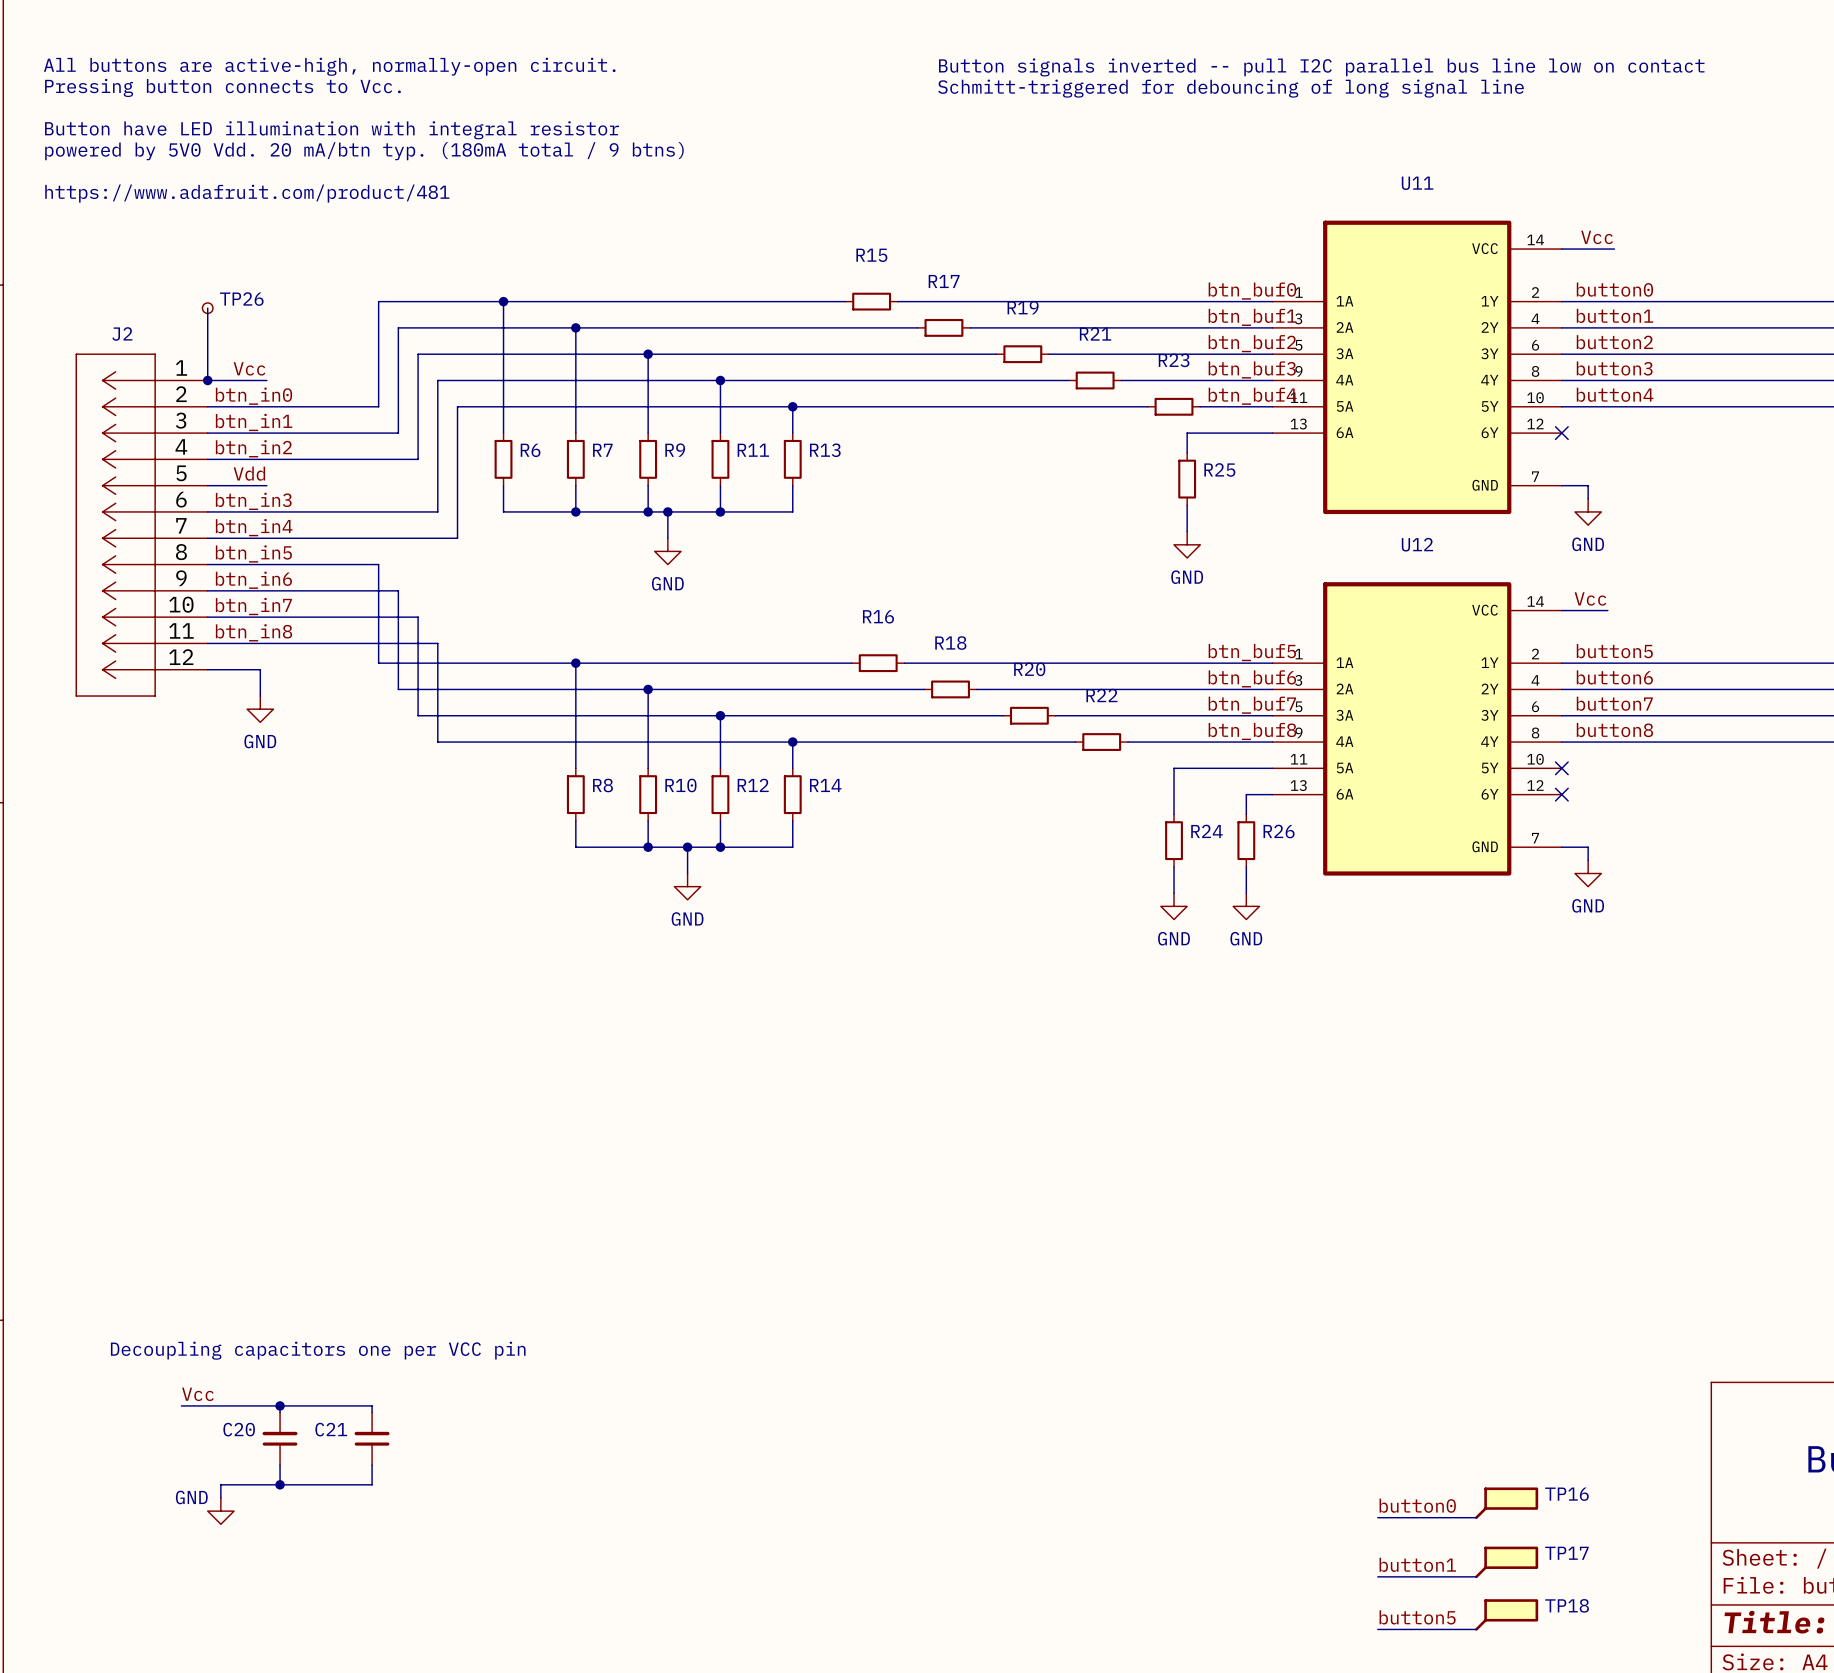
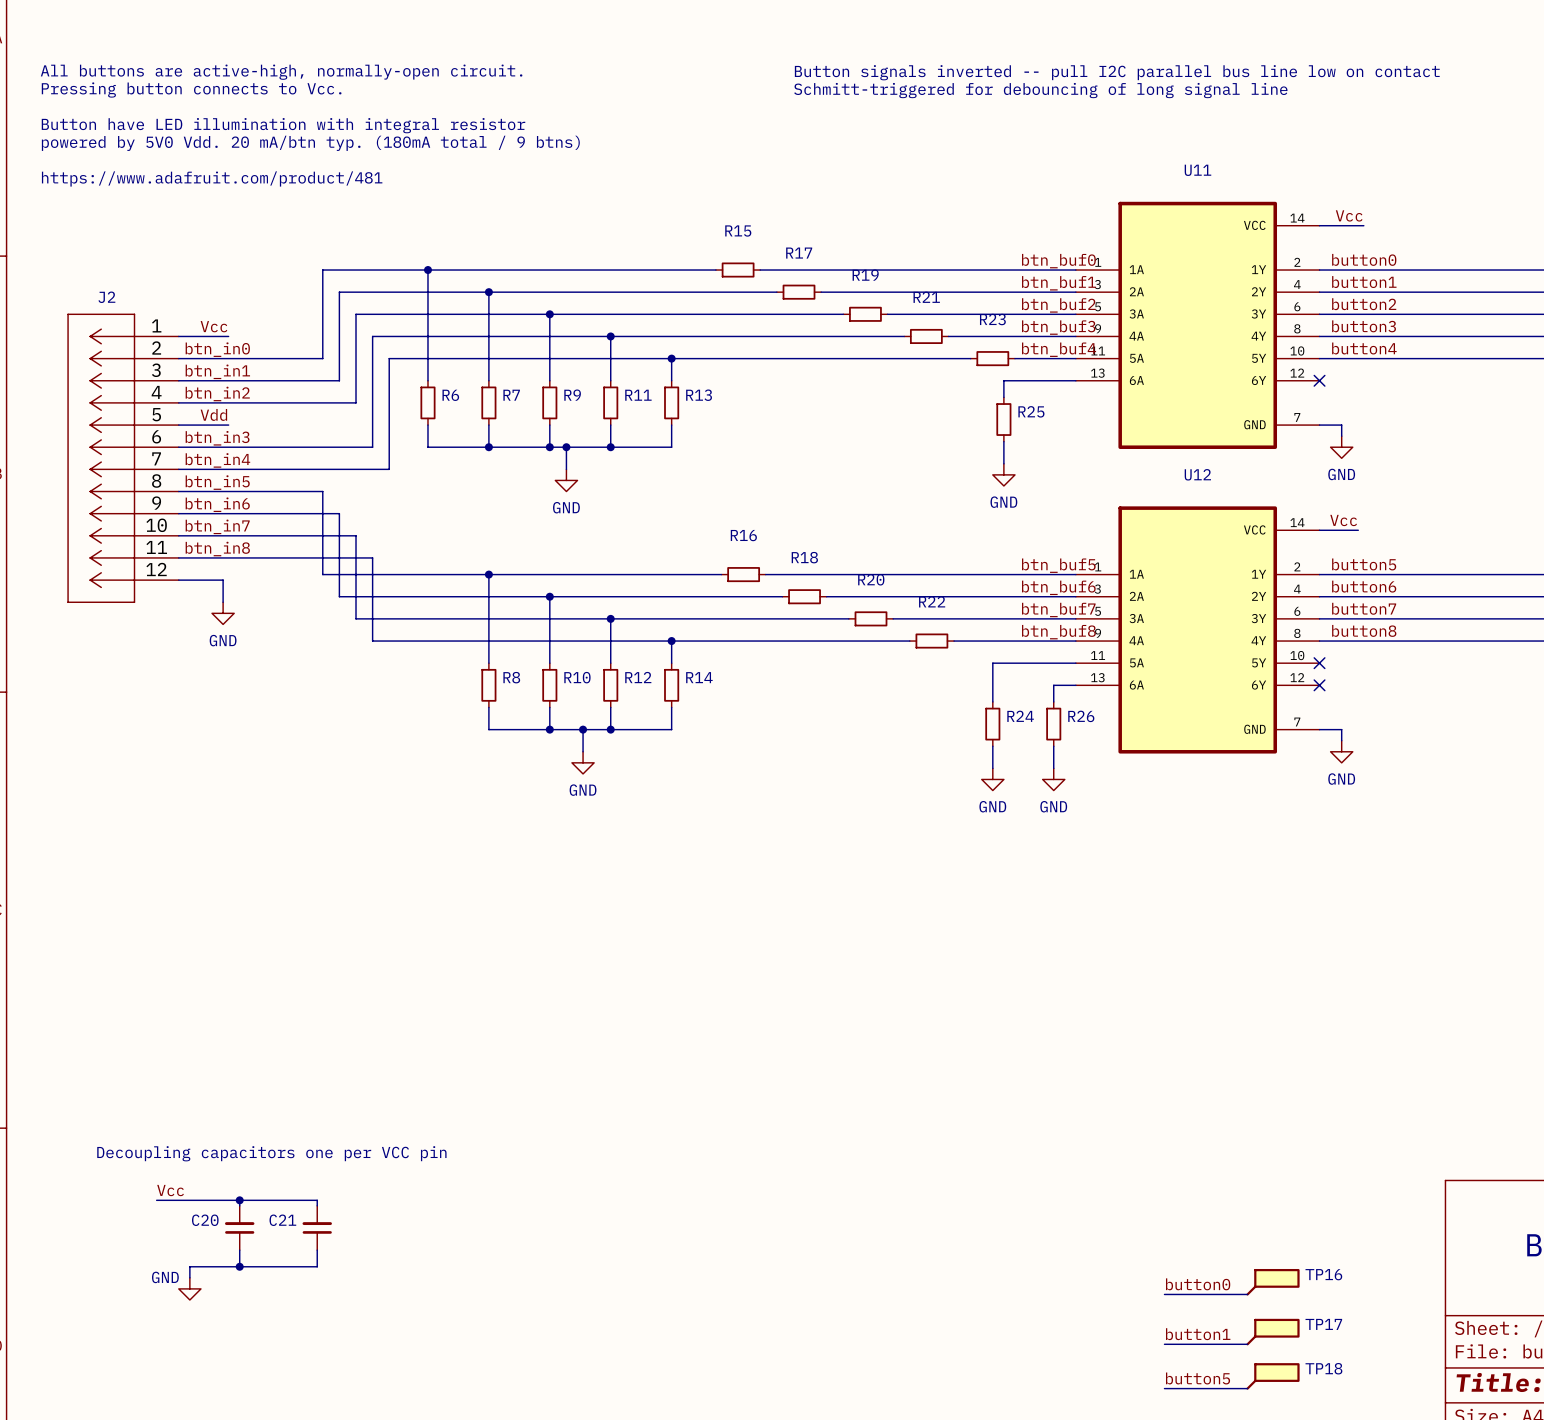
wire: (207, 308) (207, 380) -> none
TP26: (207, 308) -> none
junction: (207, 380) -> none

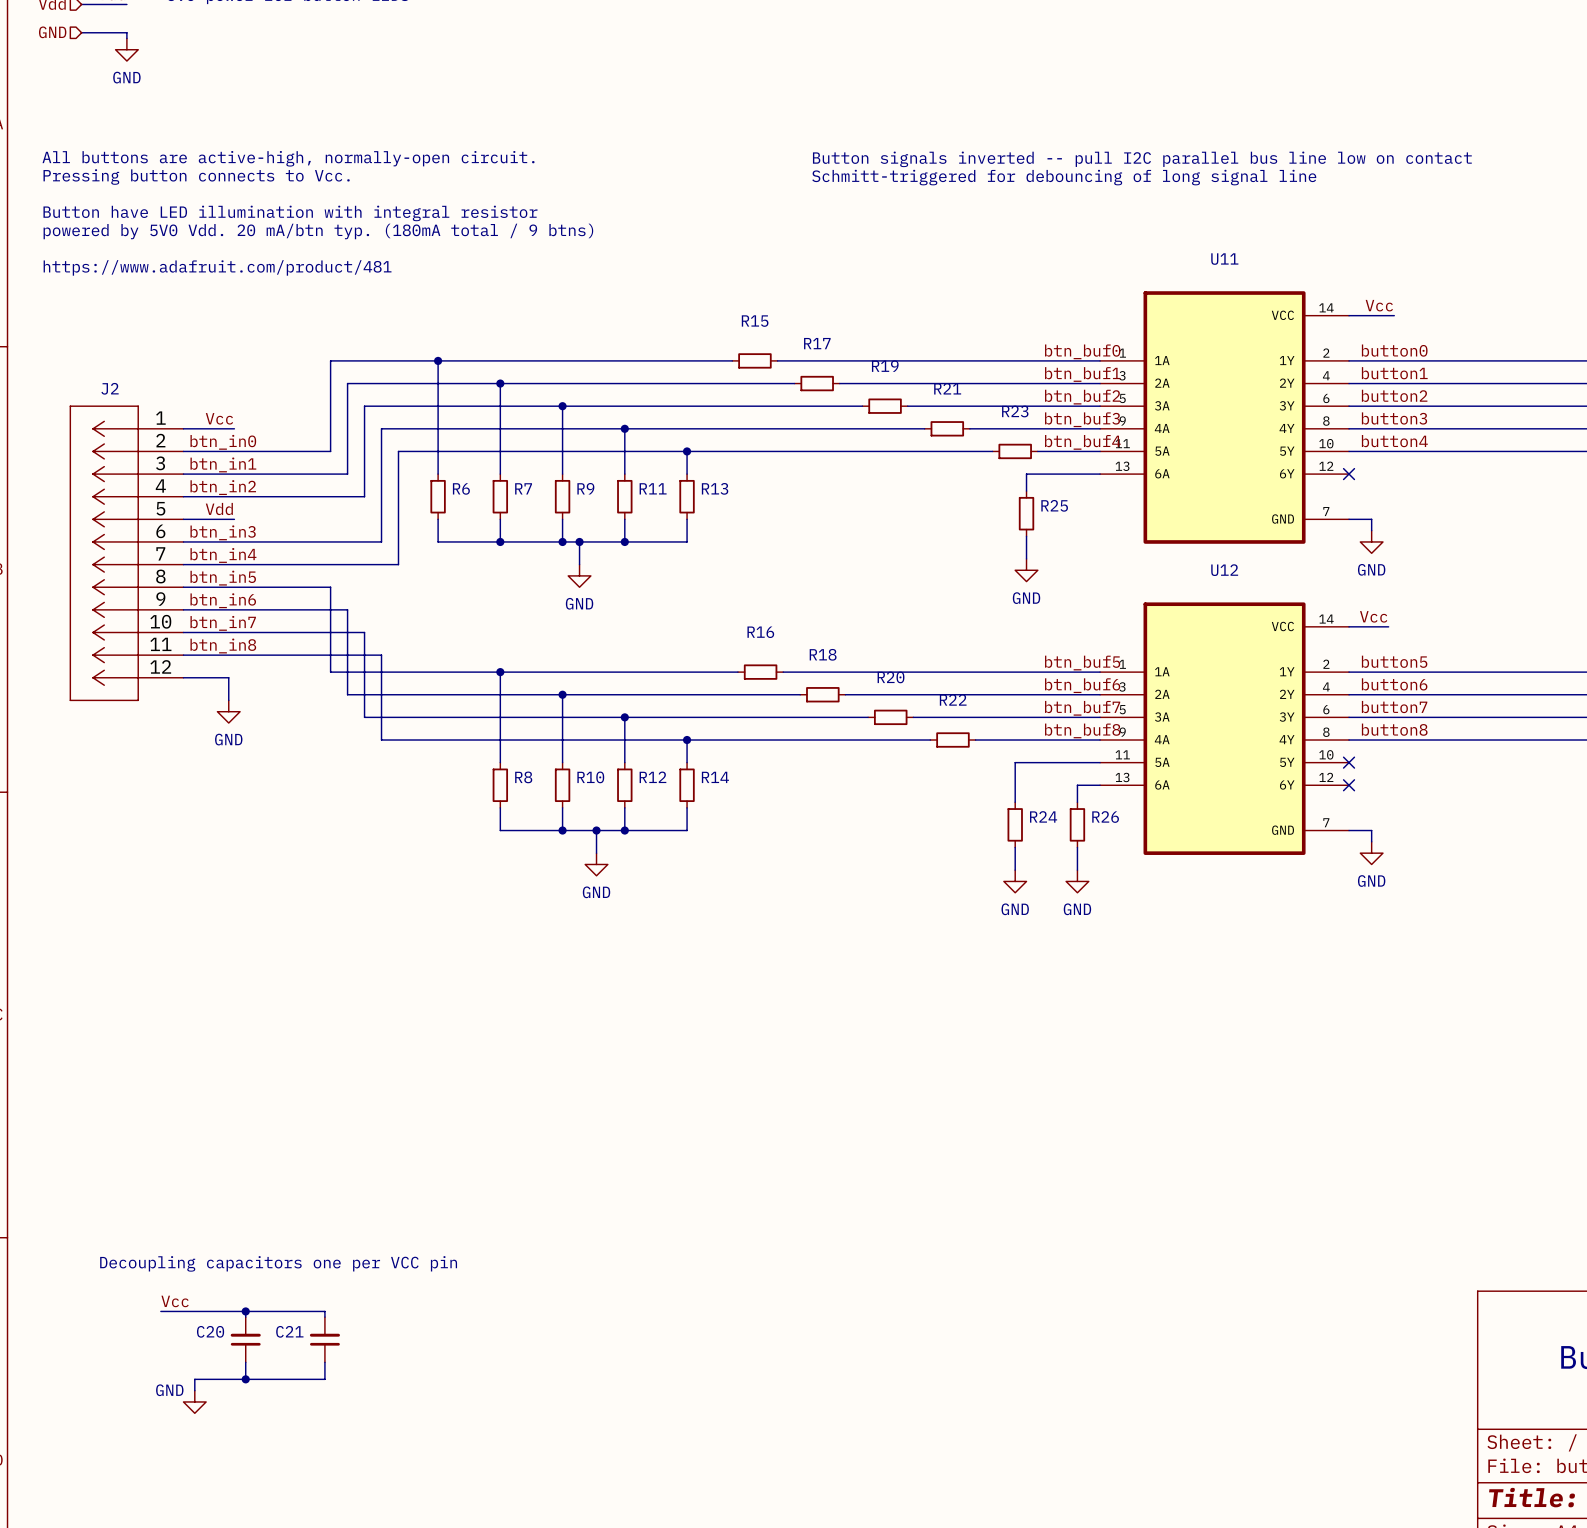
TP16: (1273, 1282) -> none
label: button0 (1198, 1284) -> none
wire: (1164, 1294) (1247, 1294) -> none
TP17: (1273, 1332) -> none
label: button1 (1198, 1334) -> none
wire: (1164, 1344) (1247, 1344) -> none
TP18: (1273, 1376) -> none
label: button5 (1198, 1378) -> none
wire: (1164, 1388) (1247, 1388) -> none

